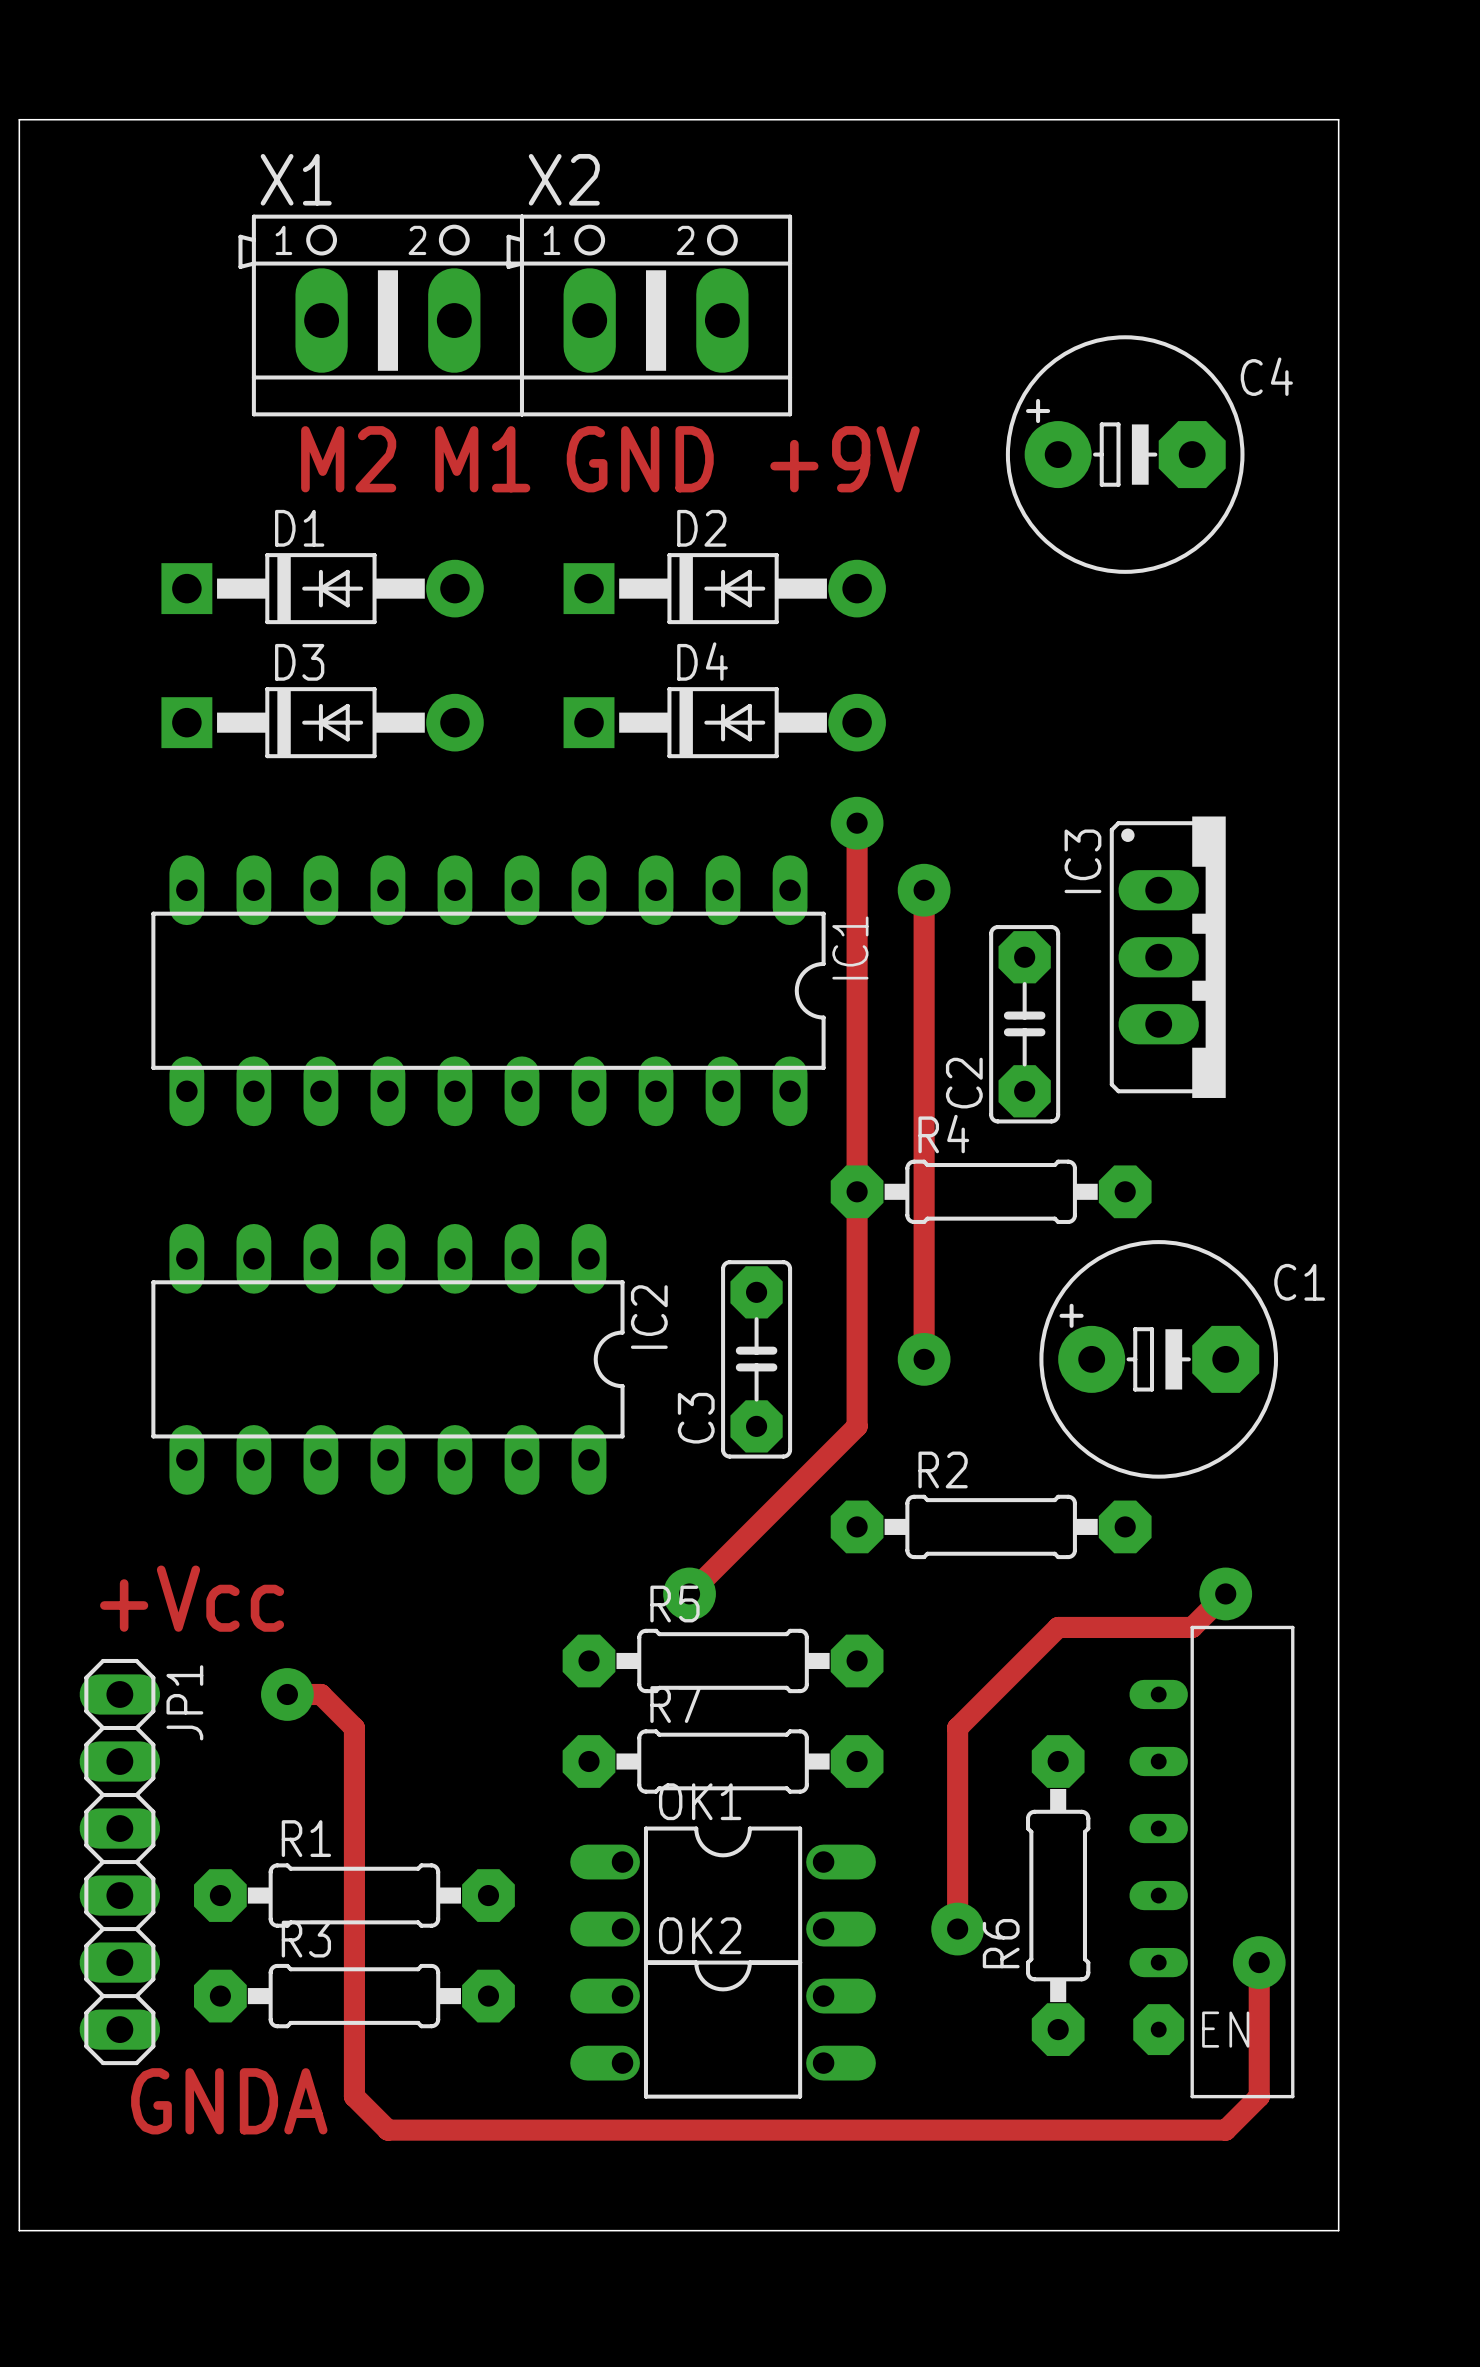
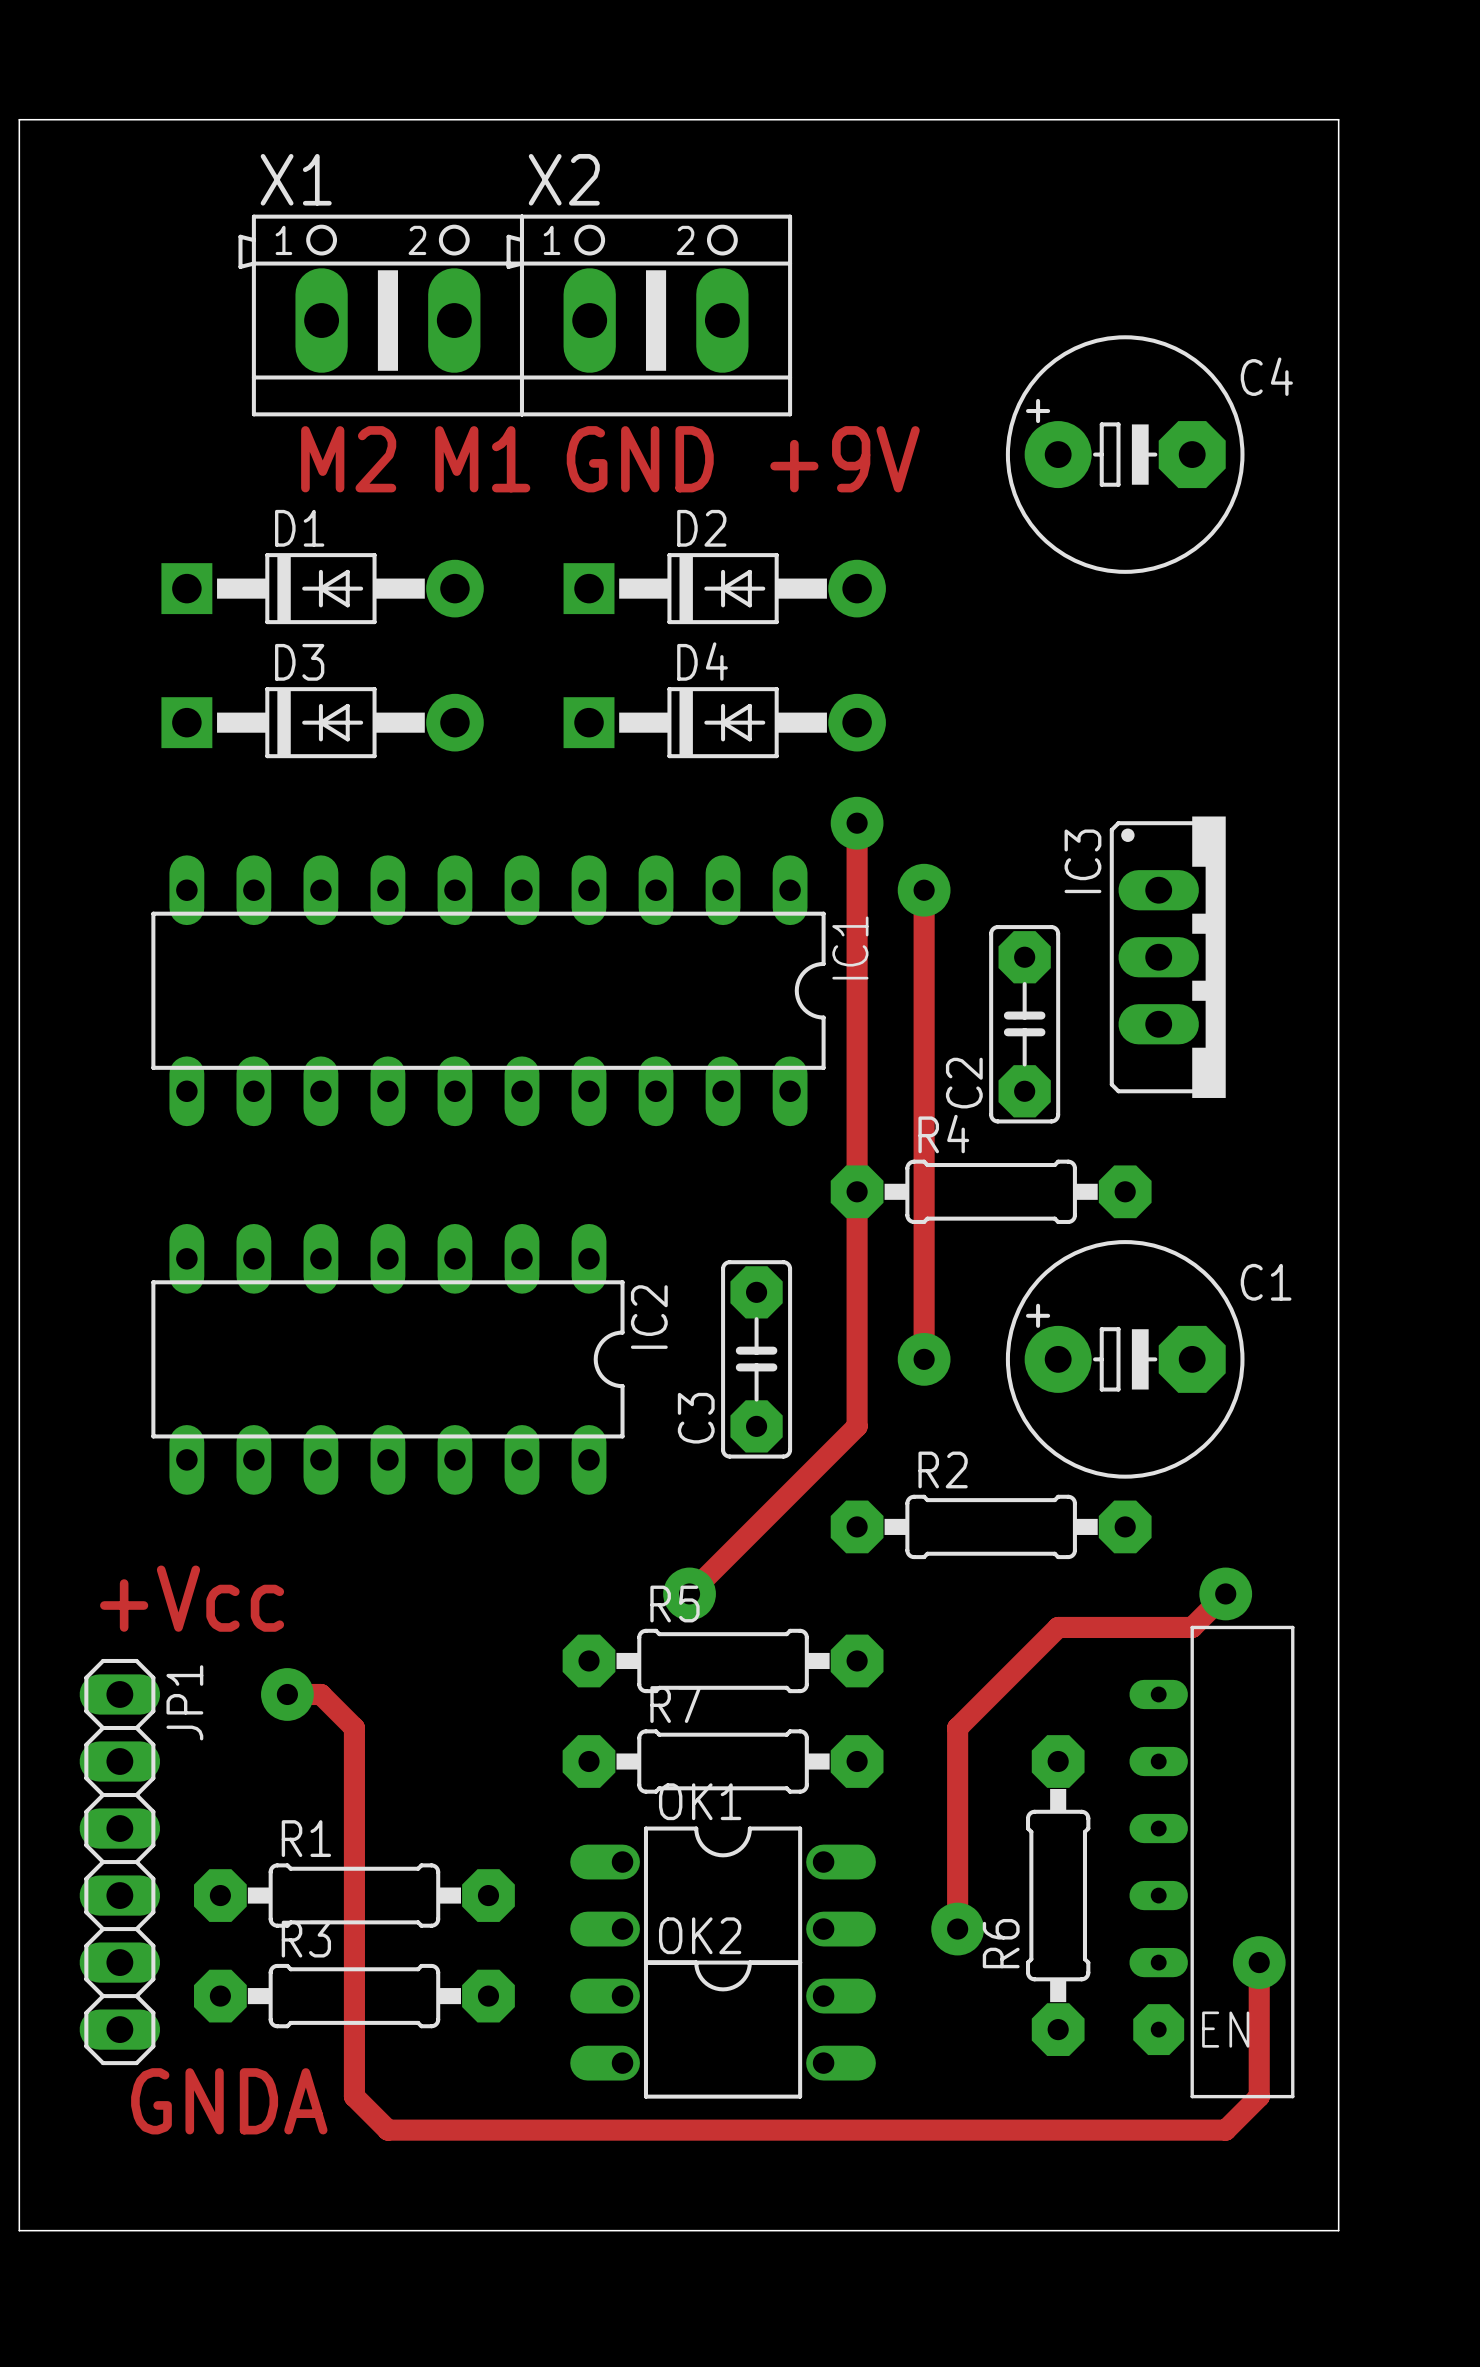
C1 position: (1158, 1359) -> (1125, 1359)

